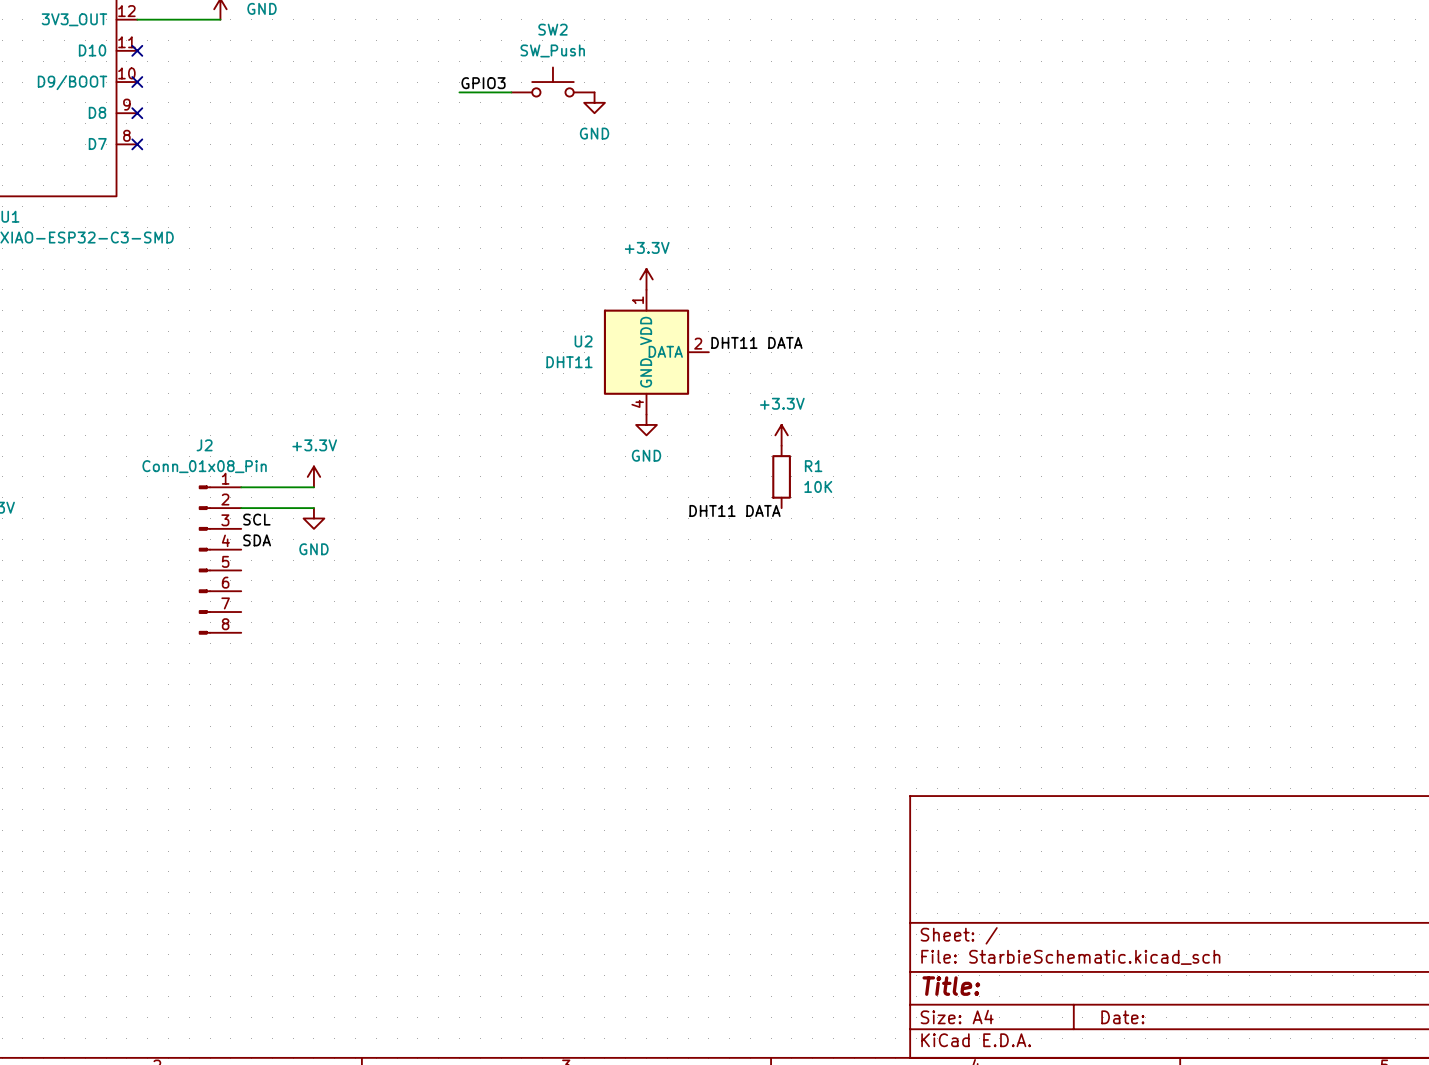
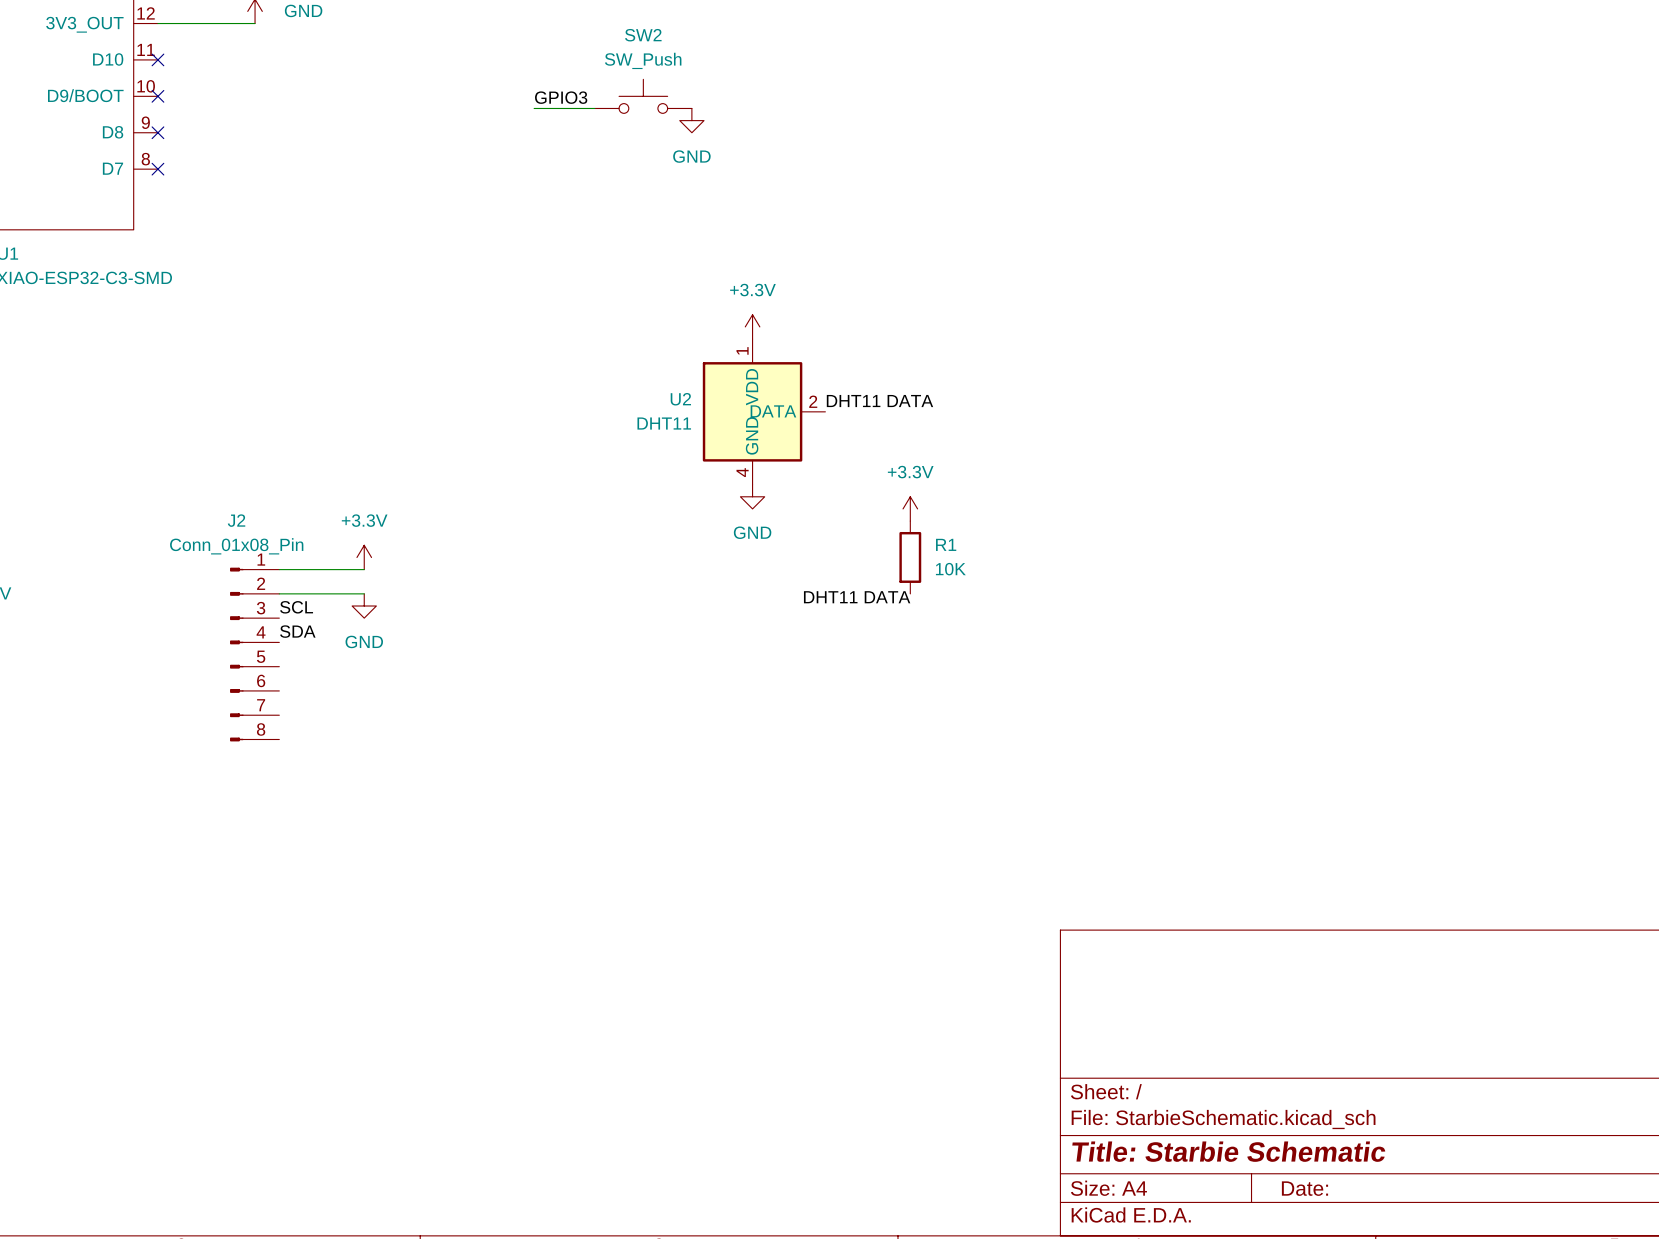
title block: Title: (951, 986) -> Title: Starbie Schematic (1228, 1151)

